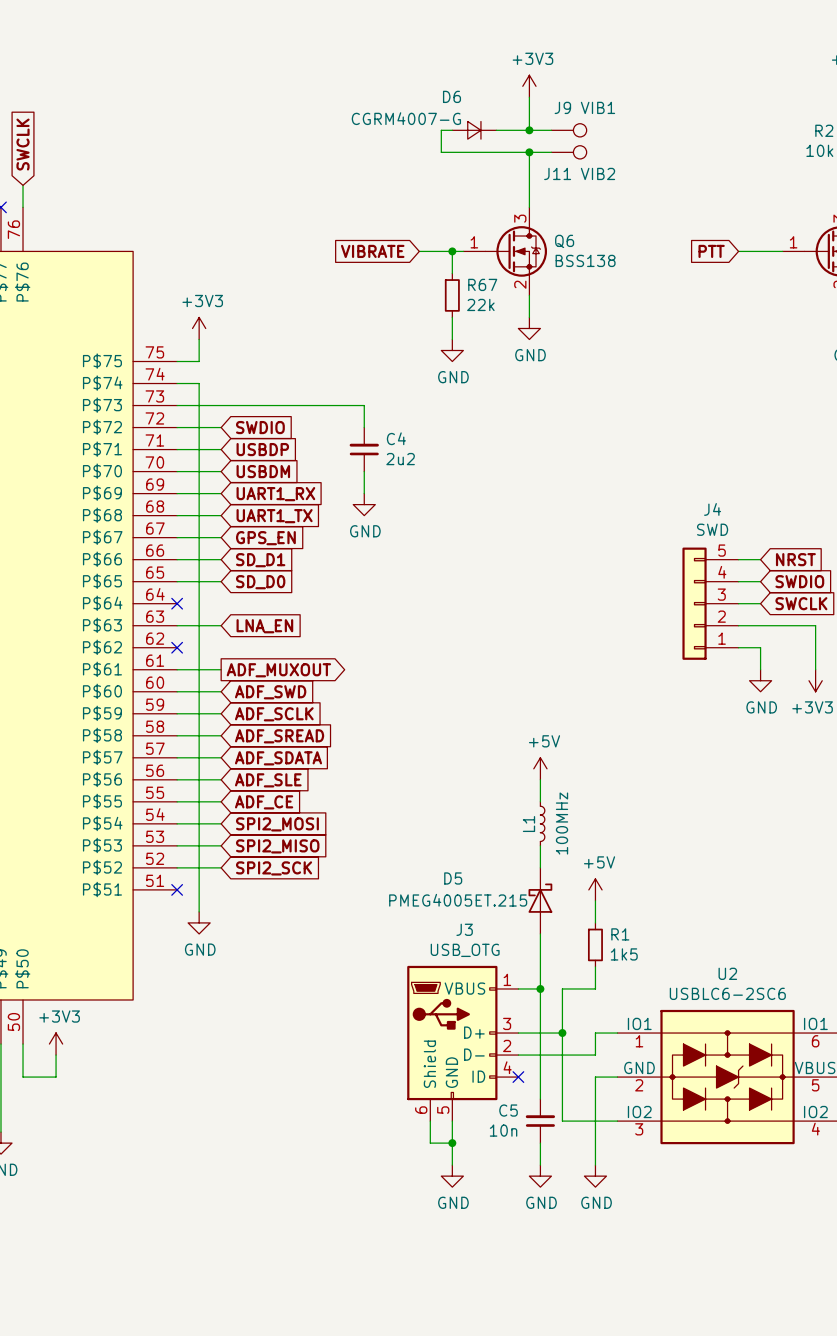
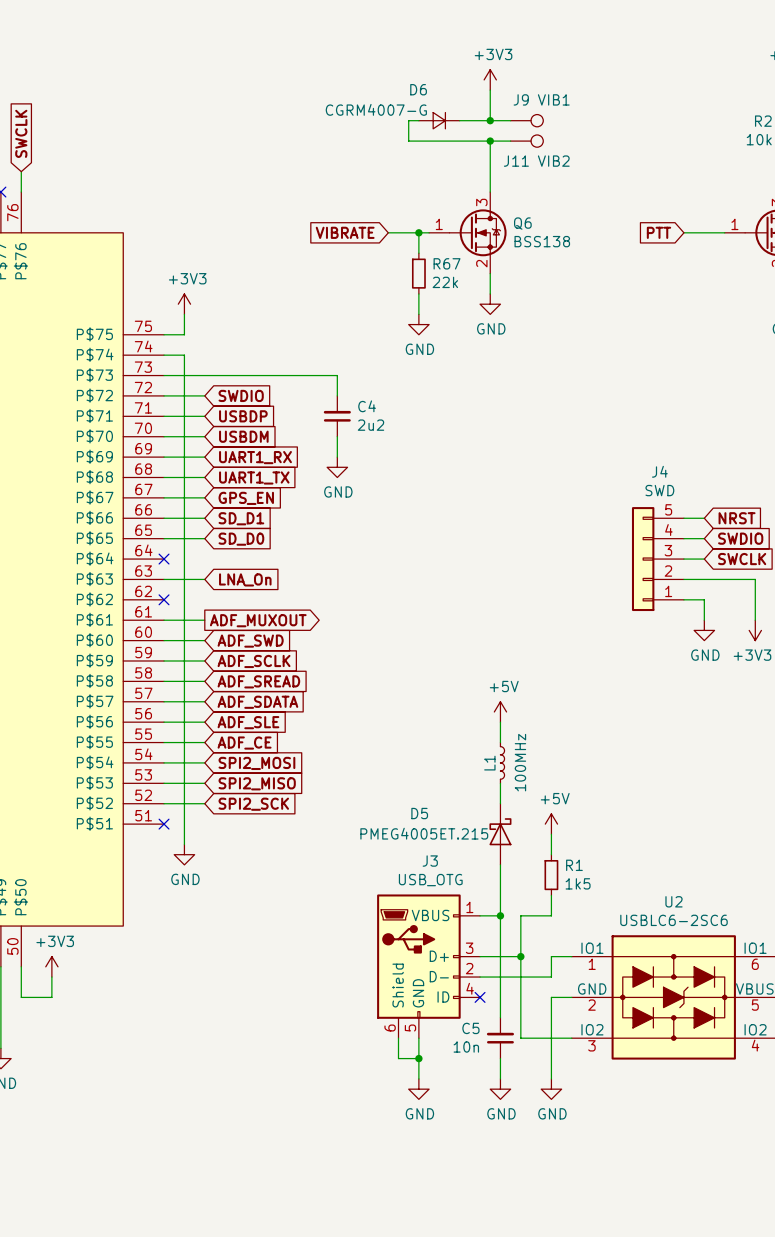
global label: LNA_EN (264, 626) -> LNA_On (245, 579)

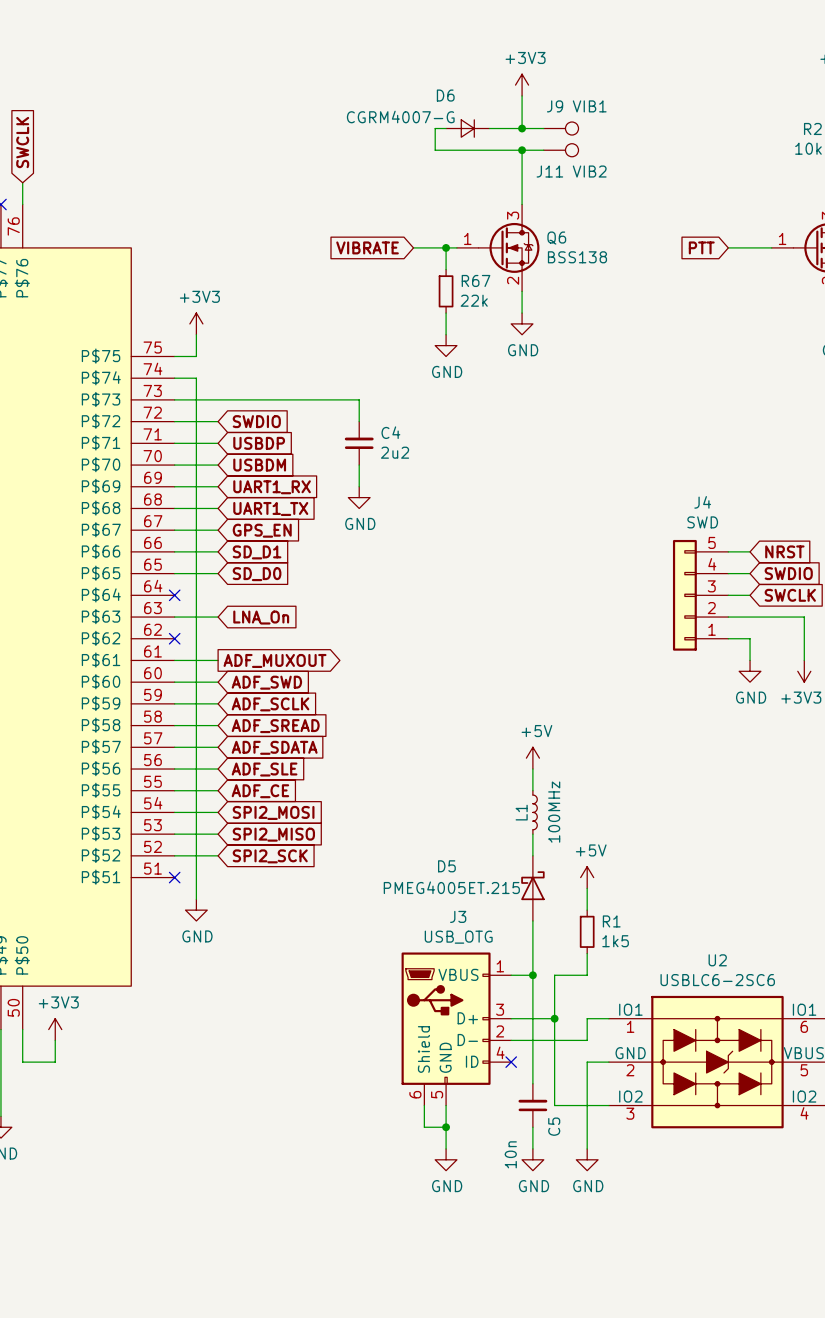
C5 name rotation: 0° (470, 1028) -> 90° counterclockwise (554, 1126)
C5 name position: C5 (470, 1028) -> C5 (554, 1126)
C5 value rotation: 0° (466, 1046) -> 90° counterclockwise (510, 1154)
C5 value position: 10n (466, 1046) -> 10n (510, 1154)

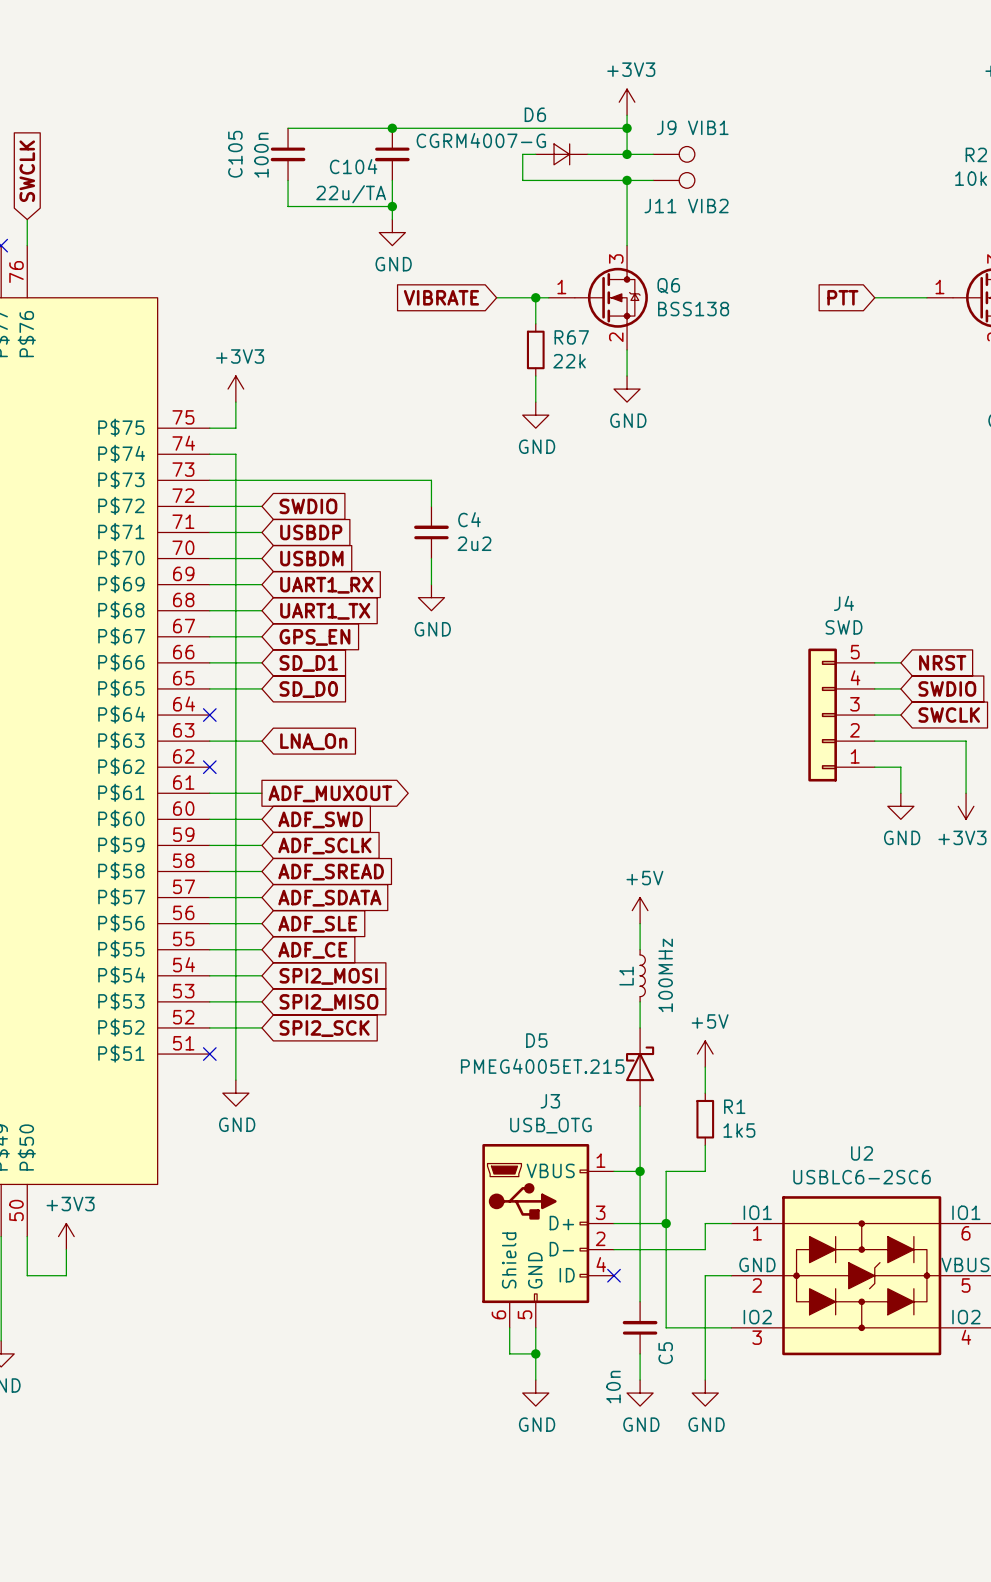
wire: none -> (288, 128) (627, 128)
junction: none -> (392, 128)
junction: none -> (627, 128)
C105: none -> 100n (288, 154)
C104: none -> 22u/TA (392, 154)
wire: none -> (288, 180) (288, 206) (392, 206)
wire: none -> (392, 180) (392, 219)
junction: none -> (392, 206)
power symbol: none -> GND (392, 232)

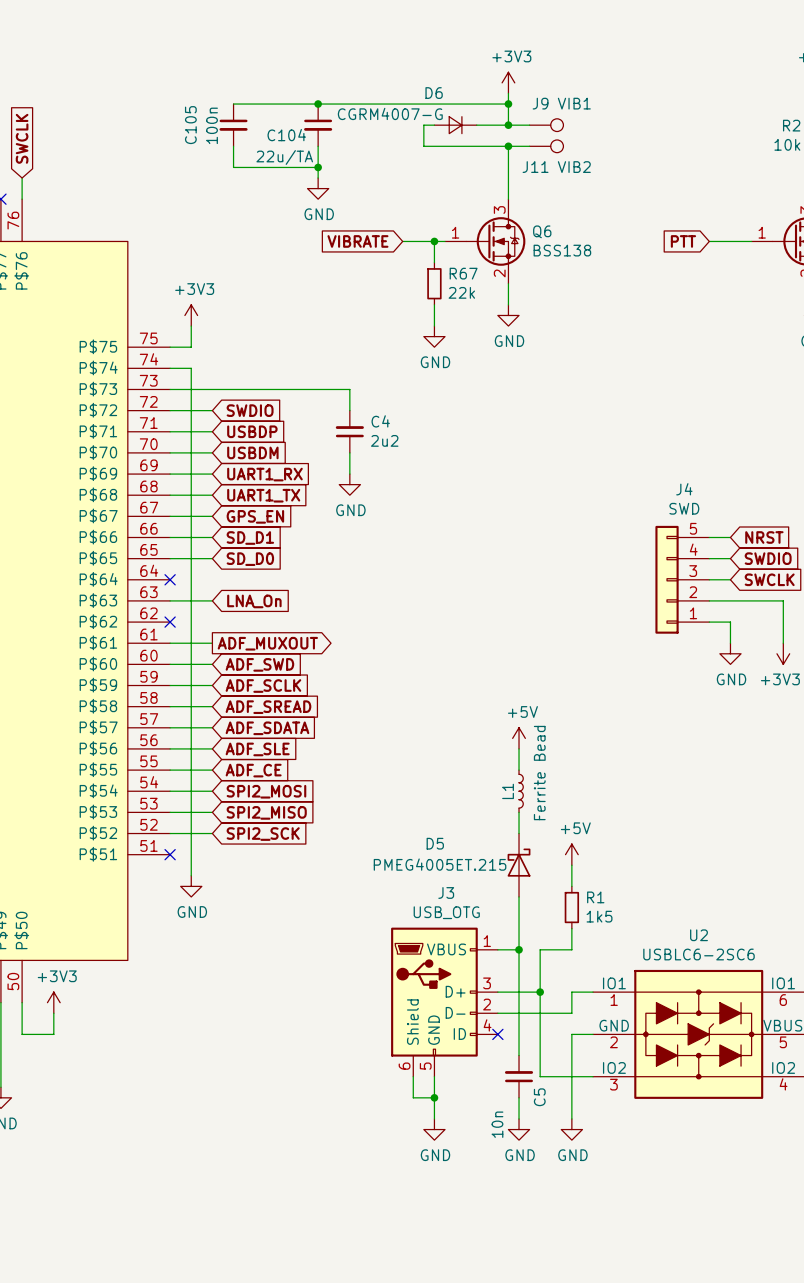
L1 value: 100MHz (665, 975) -> Ferrite Bead (539, 773)

